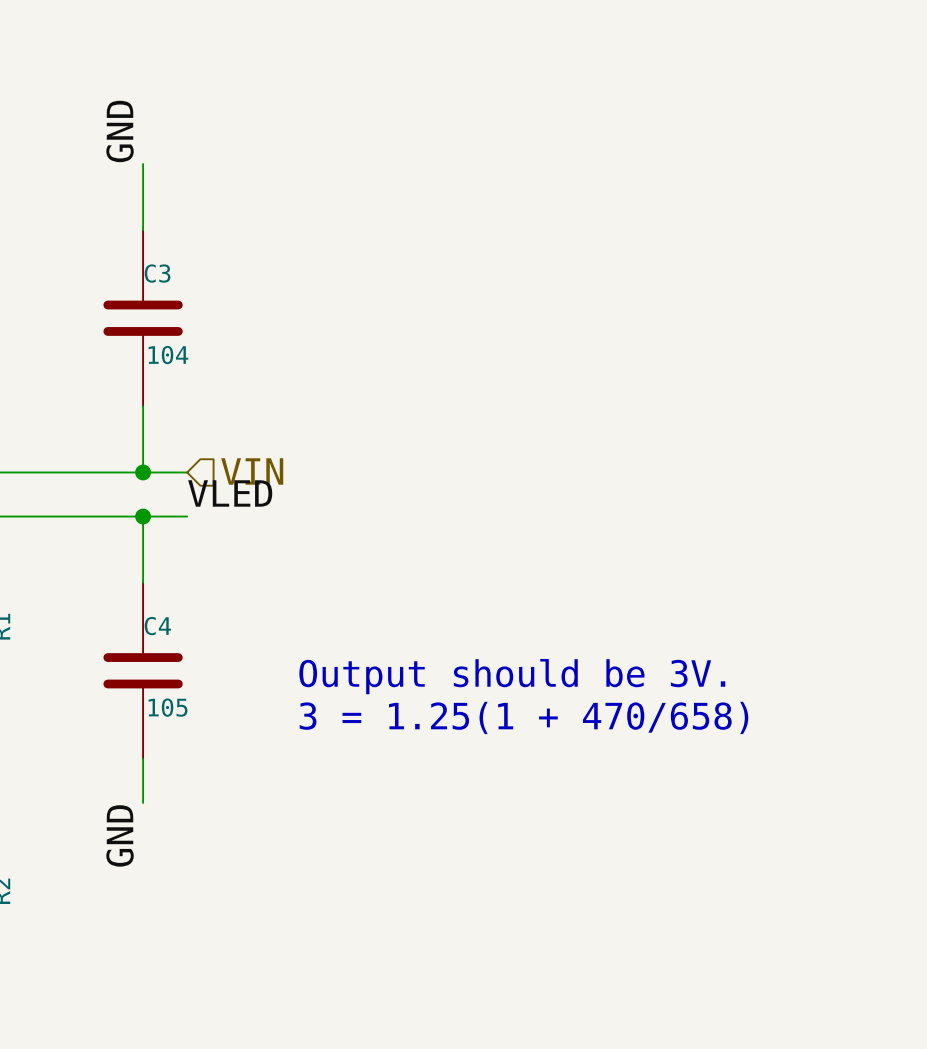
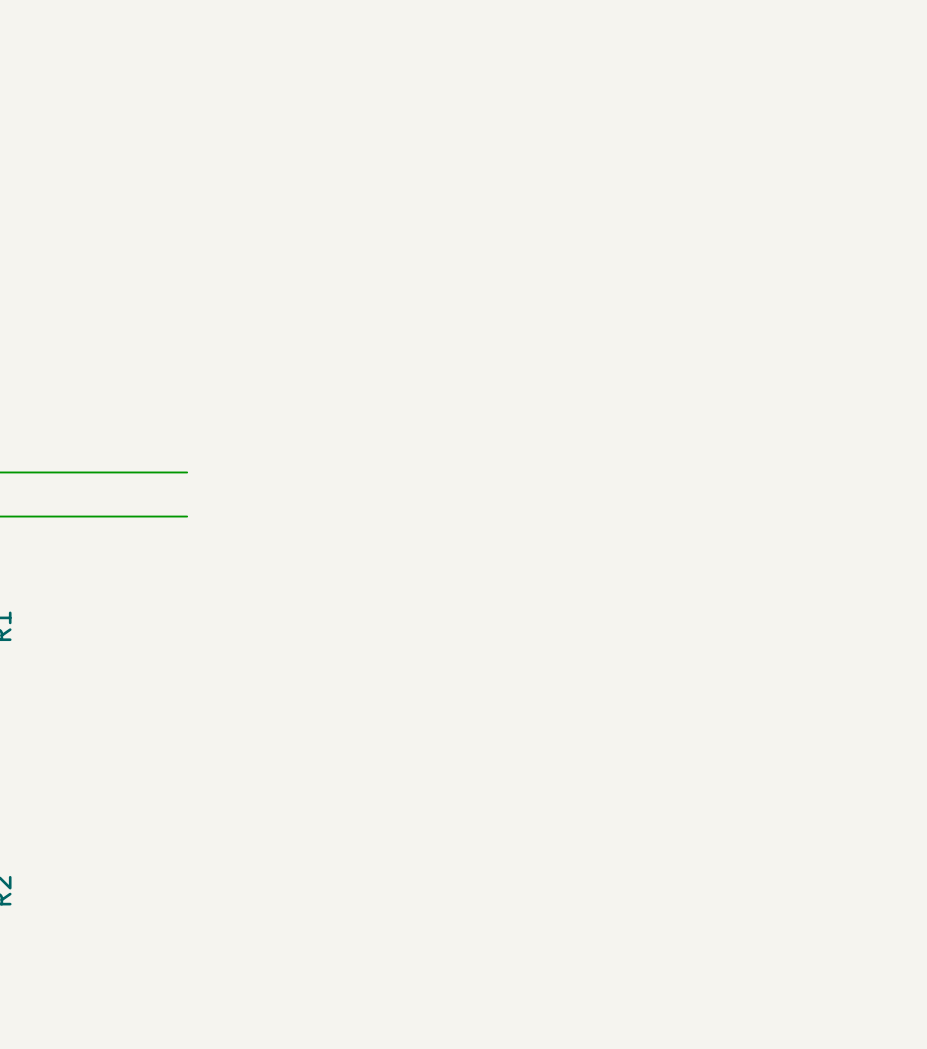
label: GND (120, 131) -> none
wire: (143, 164) (143, 230) -> none
C3: 104 (143, 318) -> none
wire: (143, 406) (143, 472) -> none
hierarchical label: VIN (252, 471) -> none
junction: (143, 472) -> none
label: VLED (230, 493) -> none
wire: (143, 516) (143, 582) -> none
junction: (143, 516) -> none
C4: 105 (143, 670) -> none
text: Output should be 3V. (512, 676) -> none
text: 3 = 1.25(1 + 470/658) (524, 717) -> none
wire: (143, 758) (143, 802) -> none
label: GND (120, 835) -> none

